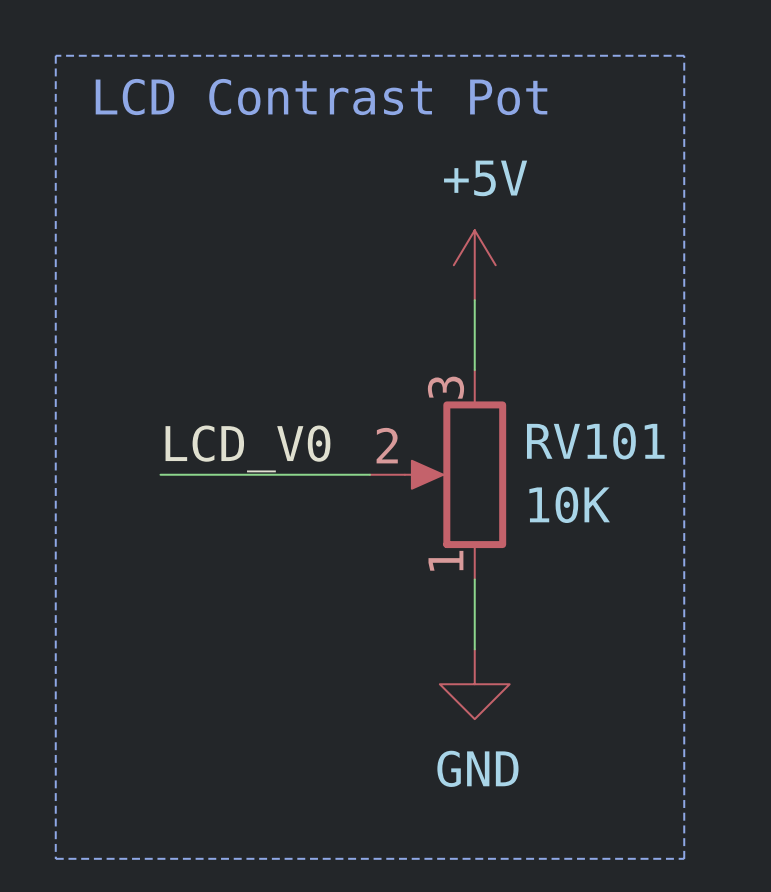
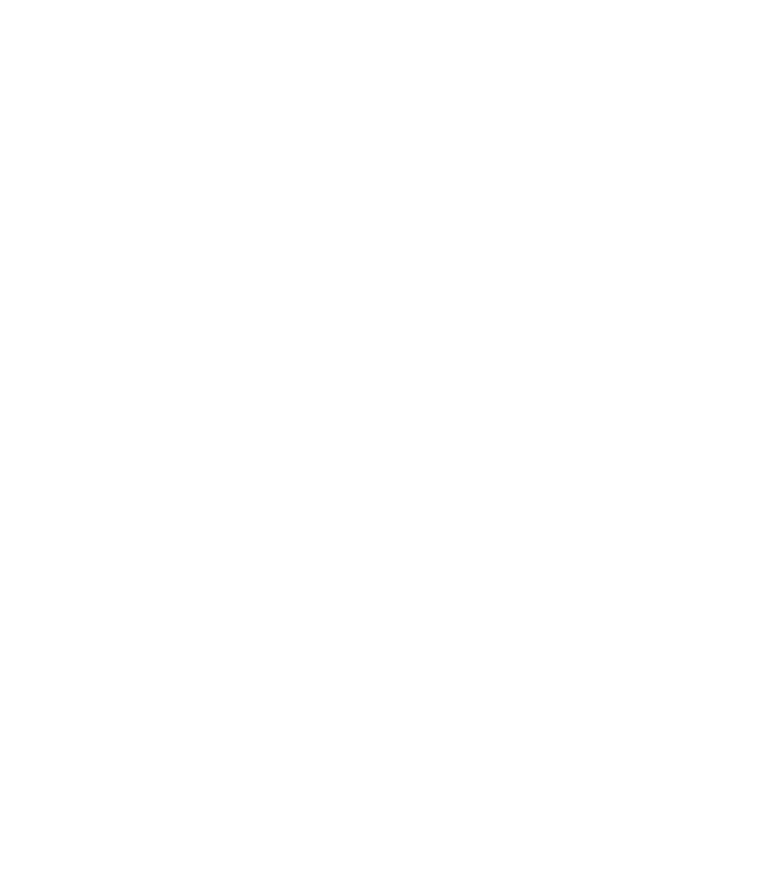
line: (55, 55) (55, 858) (684, 858) (684, 55) (55, 55) -> none
text: LCD Contrast Pot (321, 97) -> none
power symbol: +5V (474, 265) -> none
wire: (474, 300) (474, 370) -> none
label: LCD_V0 (247, 448) -> none
wire: (160, 474) (370, 474) -> none
RV101: 10K (438, 474) -> none
wire: (474, 579) (474, 649) -> none
power symbol: GND (474, 684) -> none

